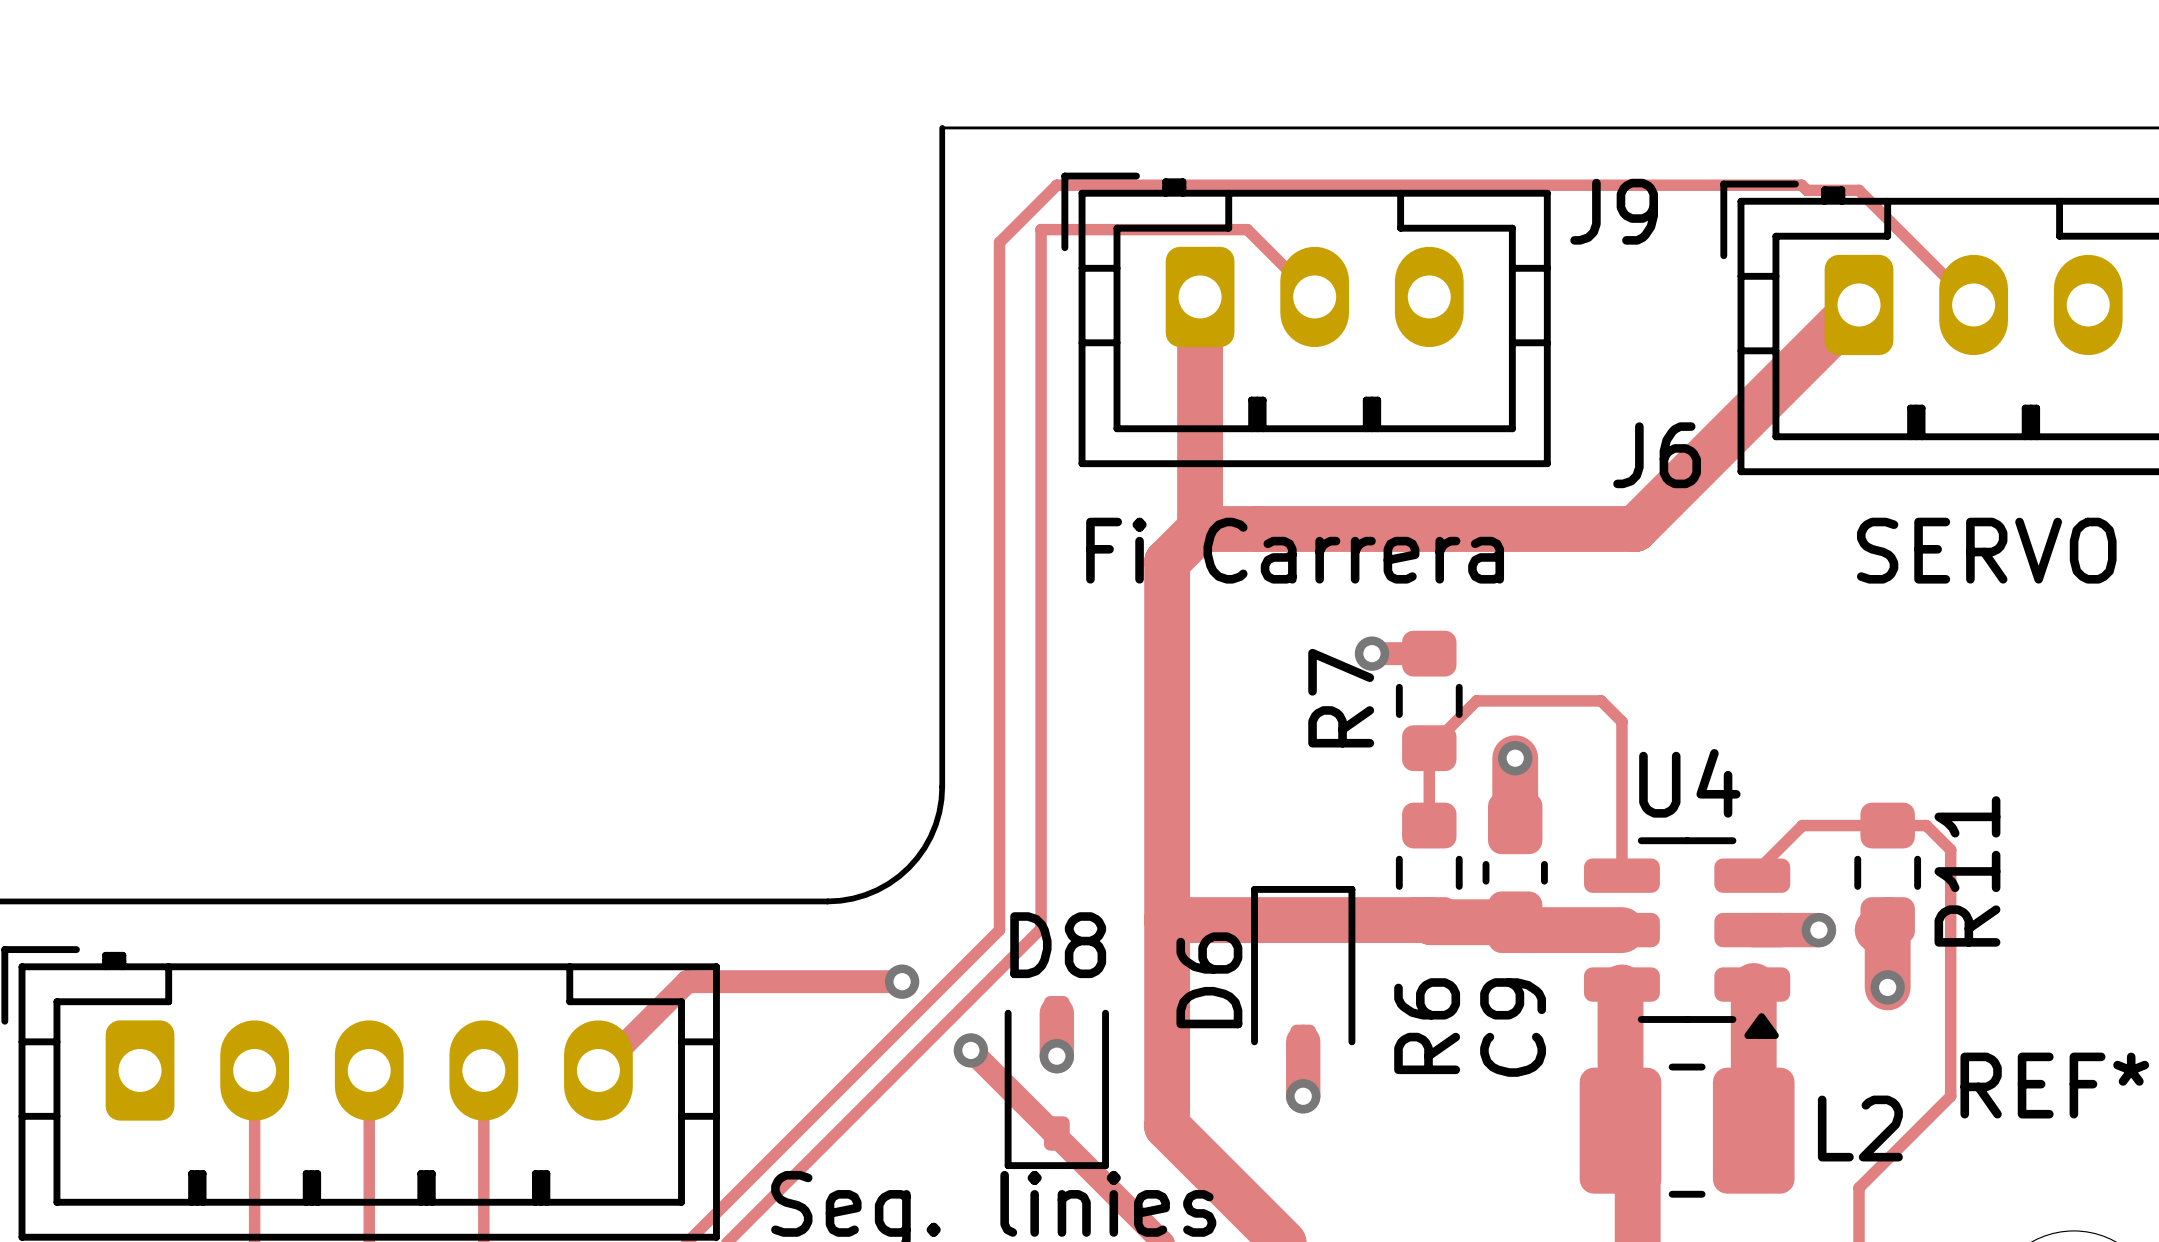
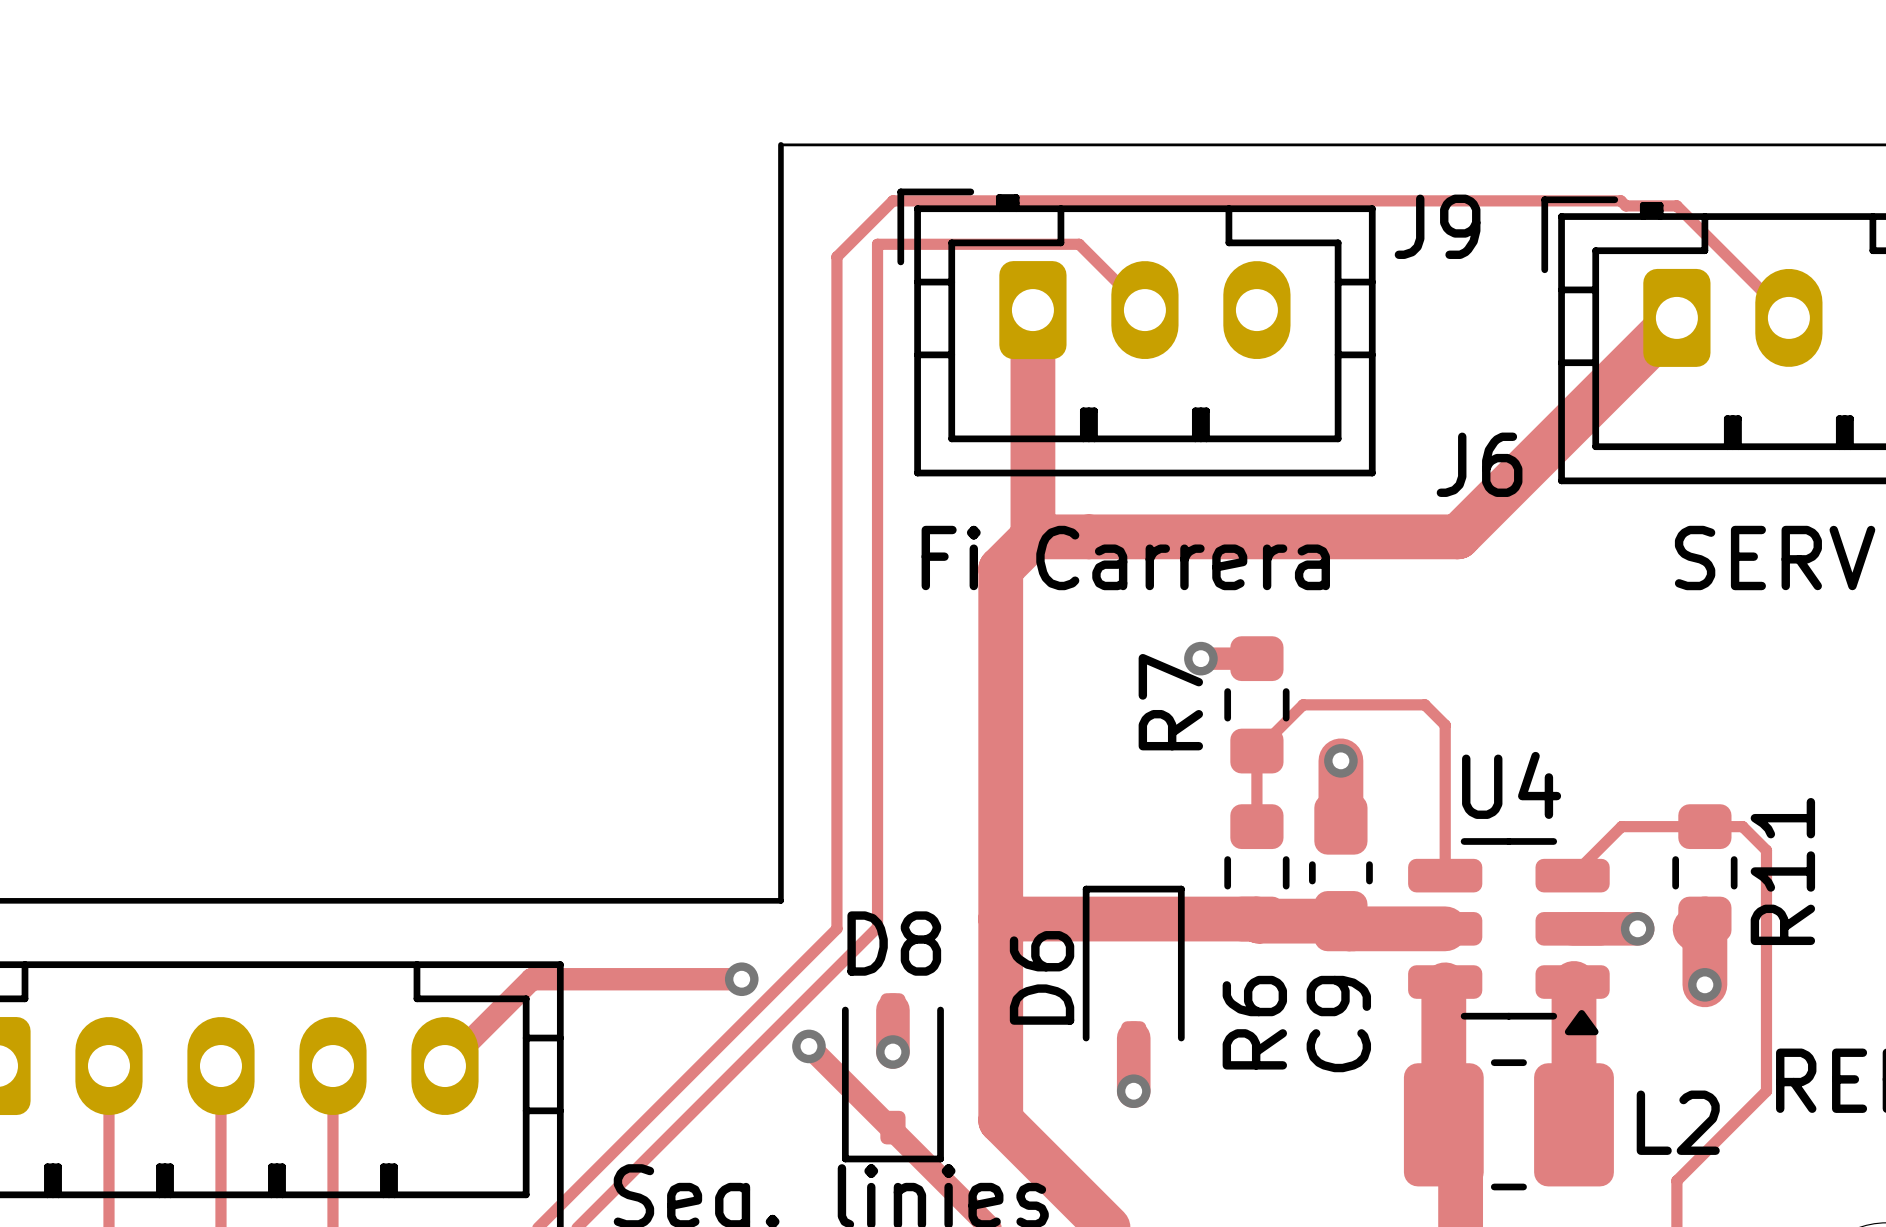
board edge: (942, 786) (939, 812) (930, 836) (908, 867) (888, 883) (865, 895) (827, 901) -> (780, 788) (780, 900) (668, 900)

